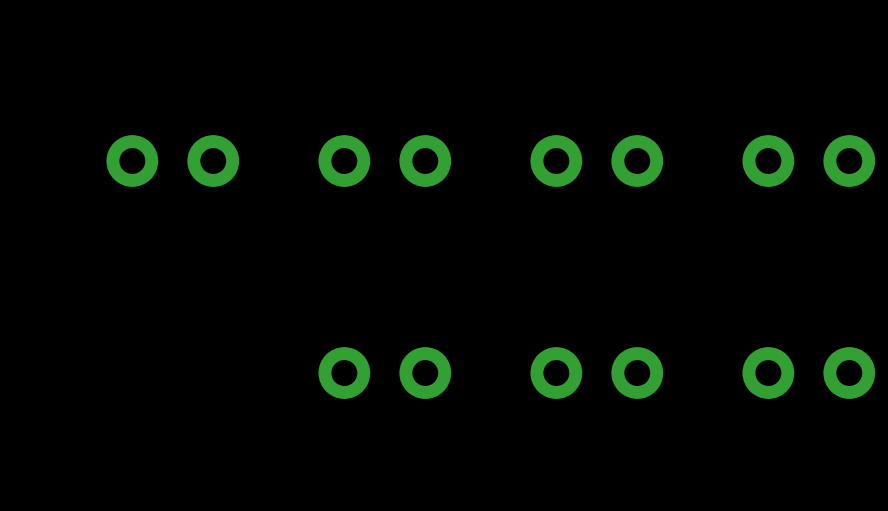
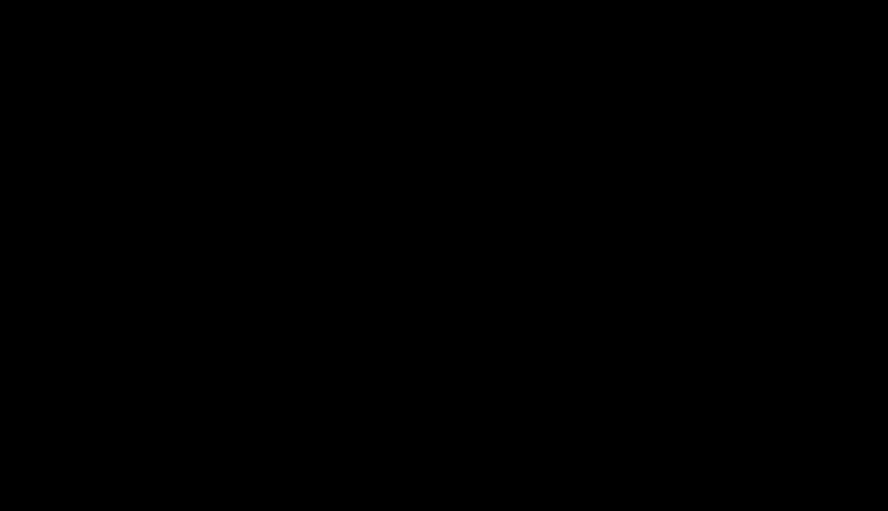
part: (172, 161) -> none
part: (384, 161) -> none
part: (596, 161) -> none
part: (808, 161) -> none
part: (384, 373) -> none
part: (596, 373) -> none
part: (808, 373) -> none

